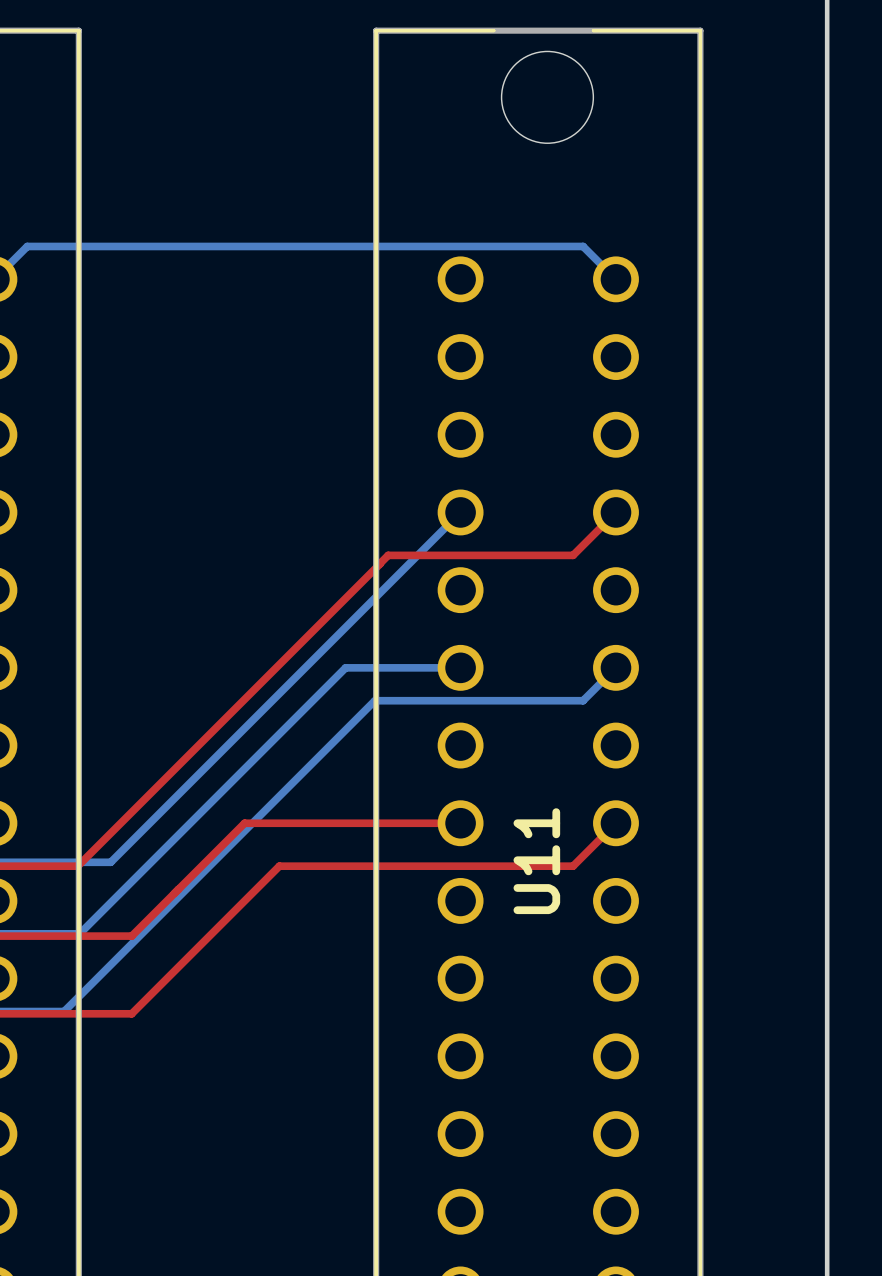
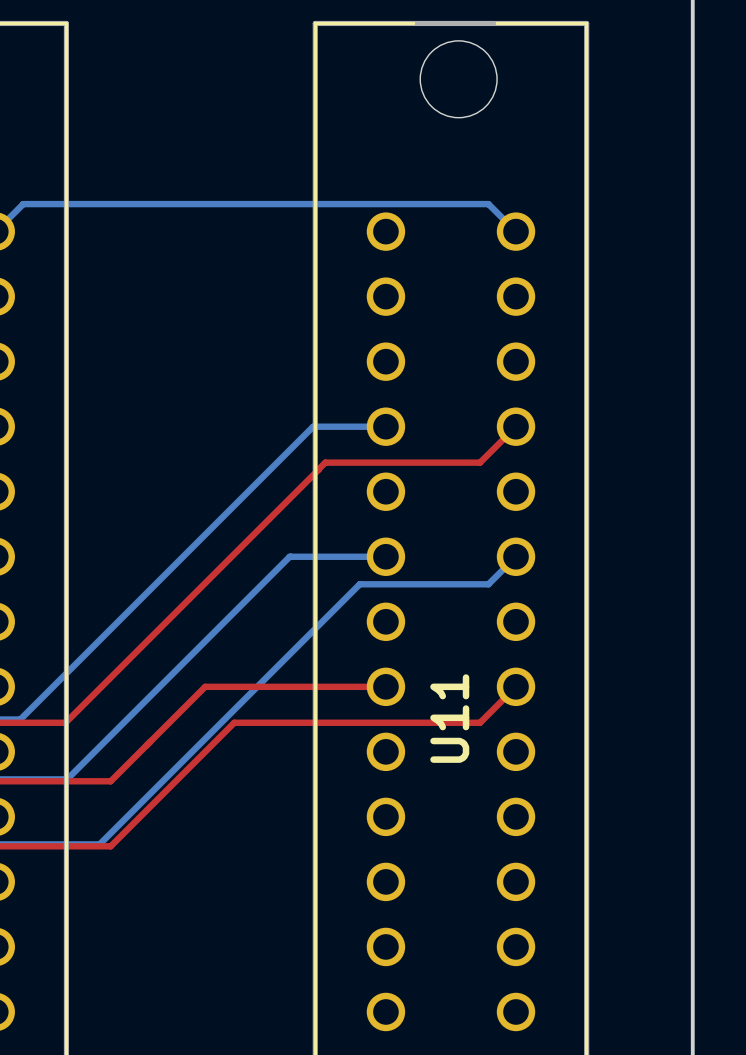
bottom track: (460, 512) (110, 862) (23, 862) -> (385, 426) (313, 426) (20, 719)
bottom track: (429, 700) (374, 700) (64, 1011) -> (359, 584) (99, 844) (54, 844)

